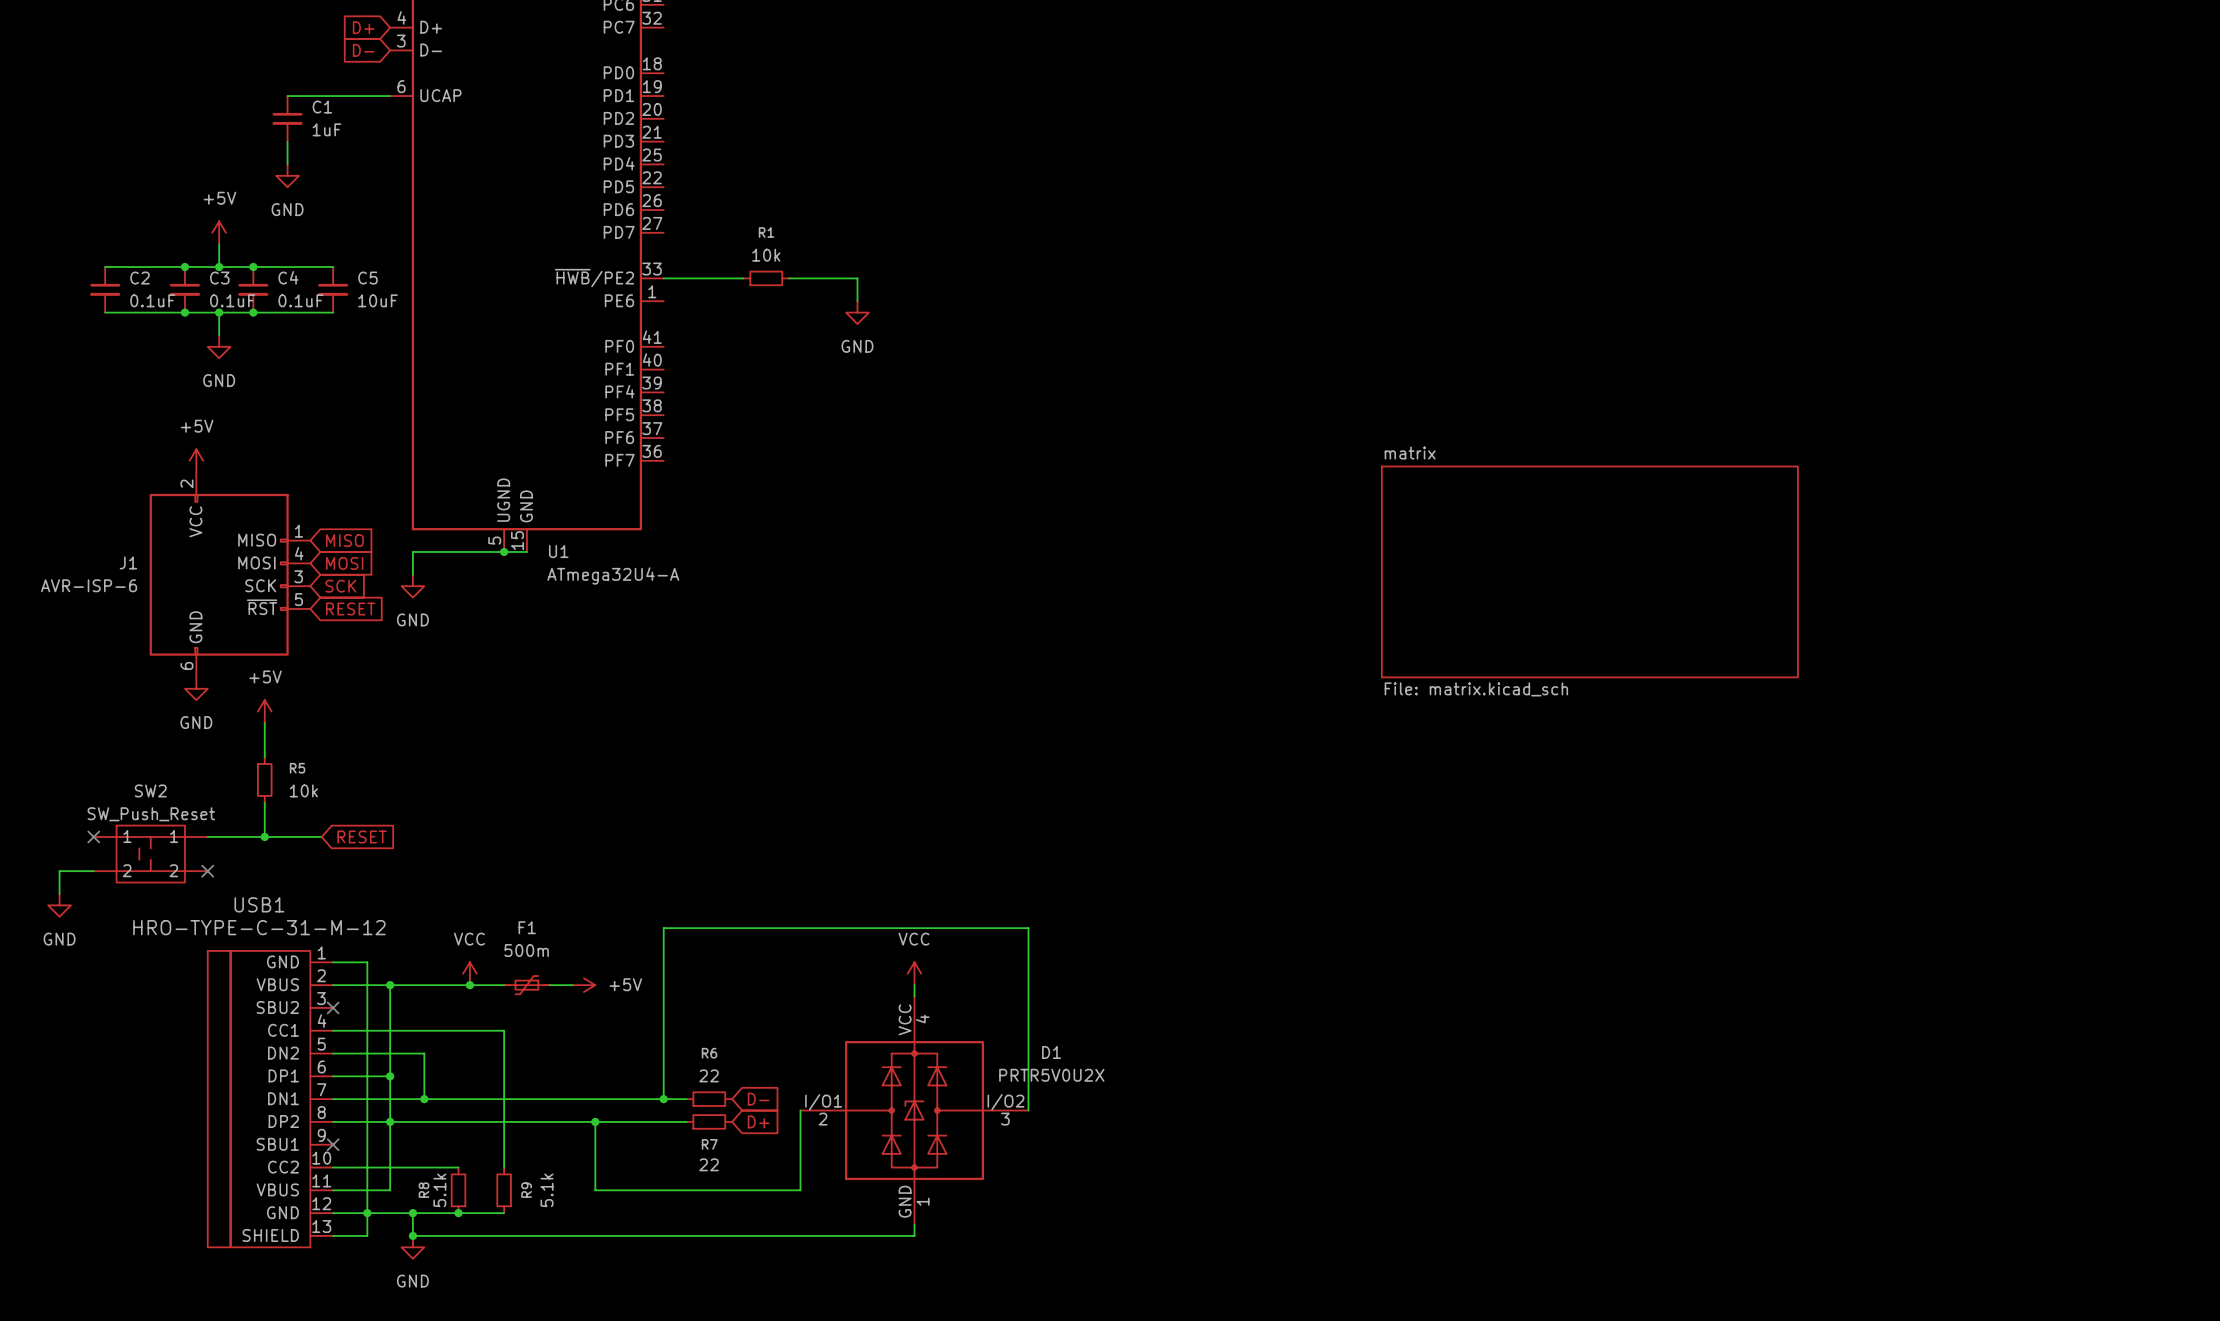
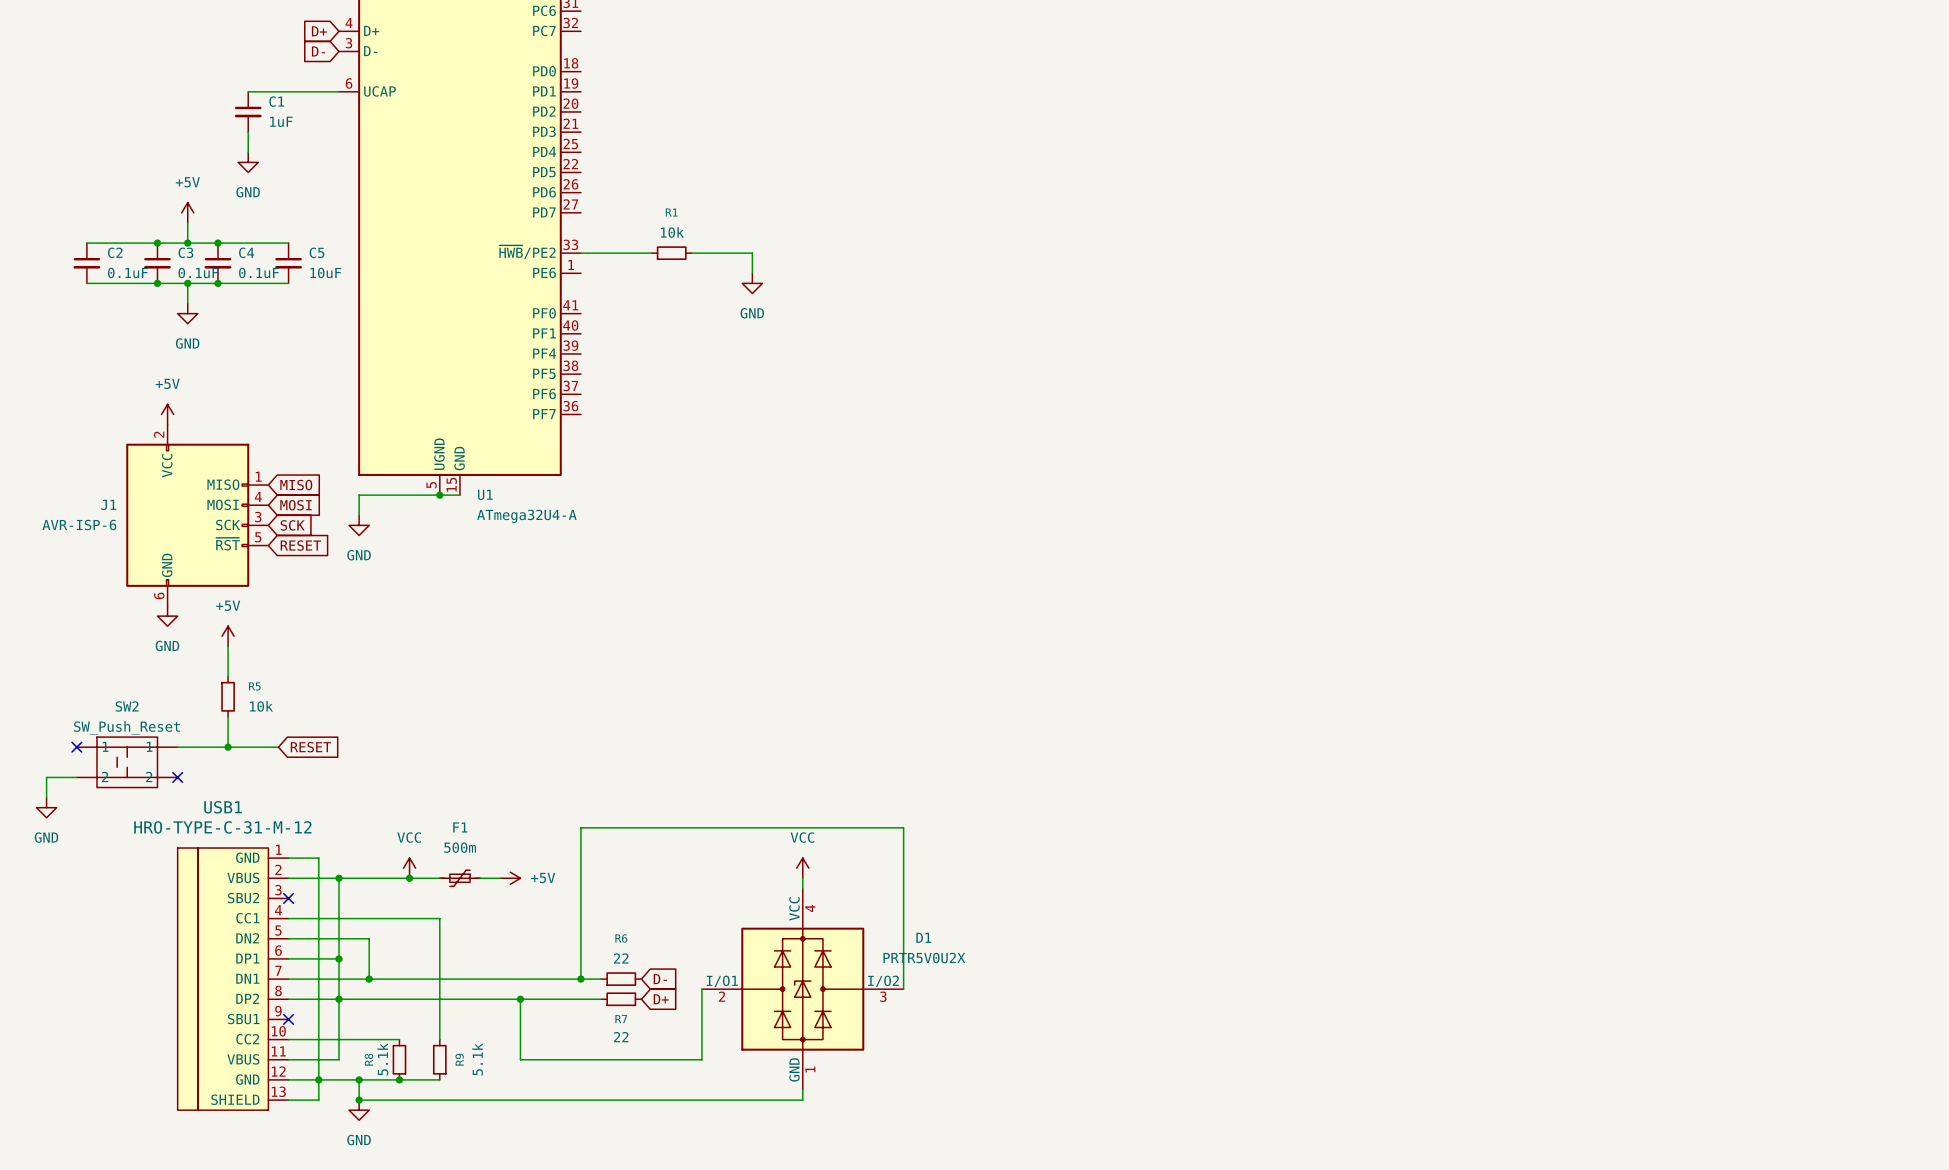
sheet matrix: File: matrix.kicad_sch (1589, 571) -> none

